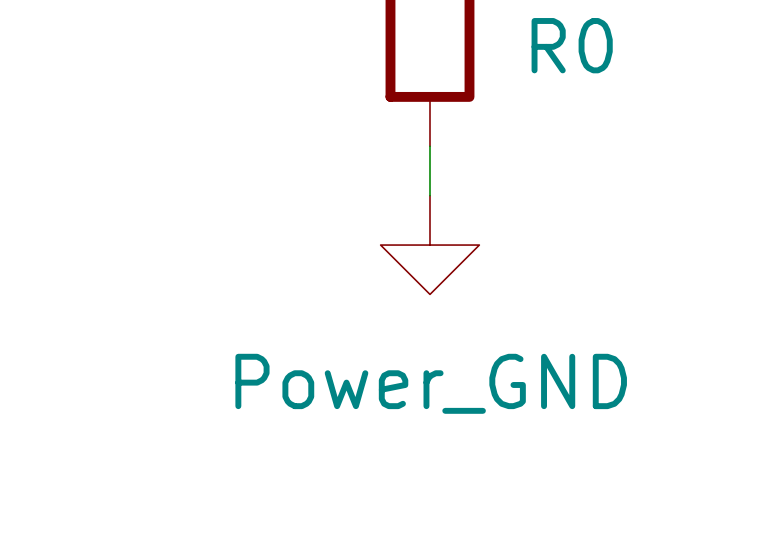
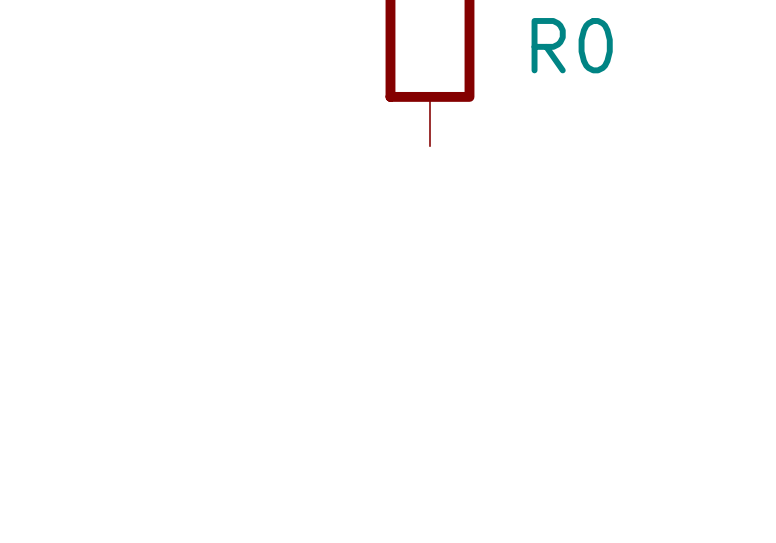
wire: (429, 146) (429, 195) -> none
power symbol: Power_GND (429, 245) -> none

